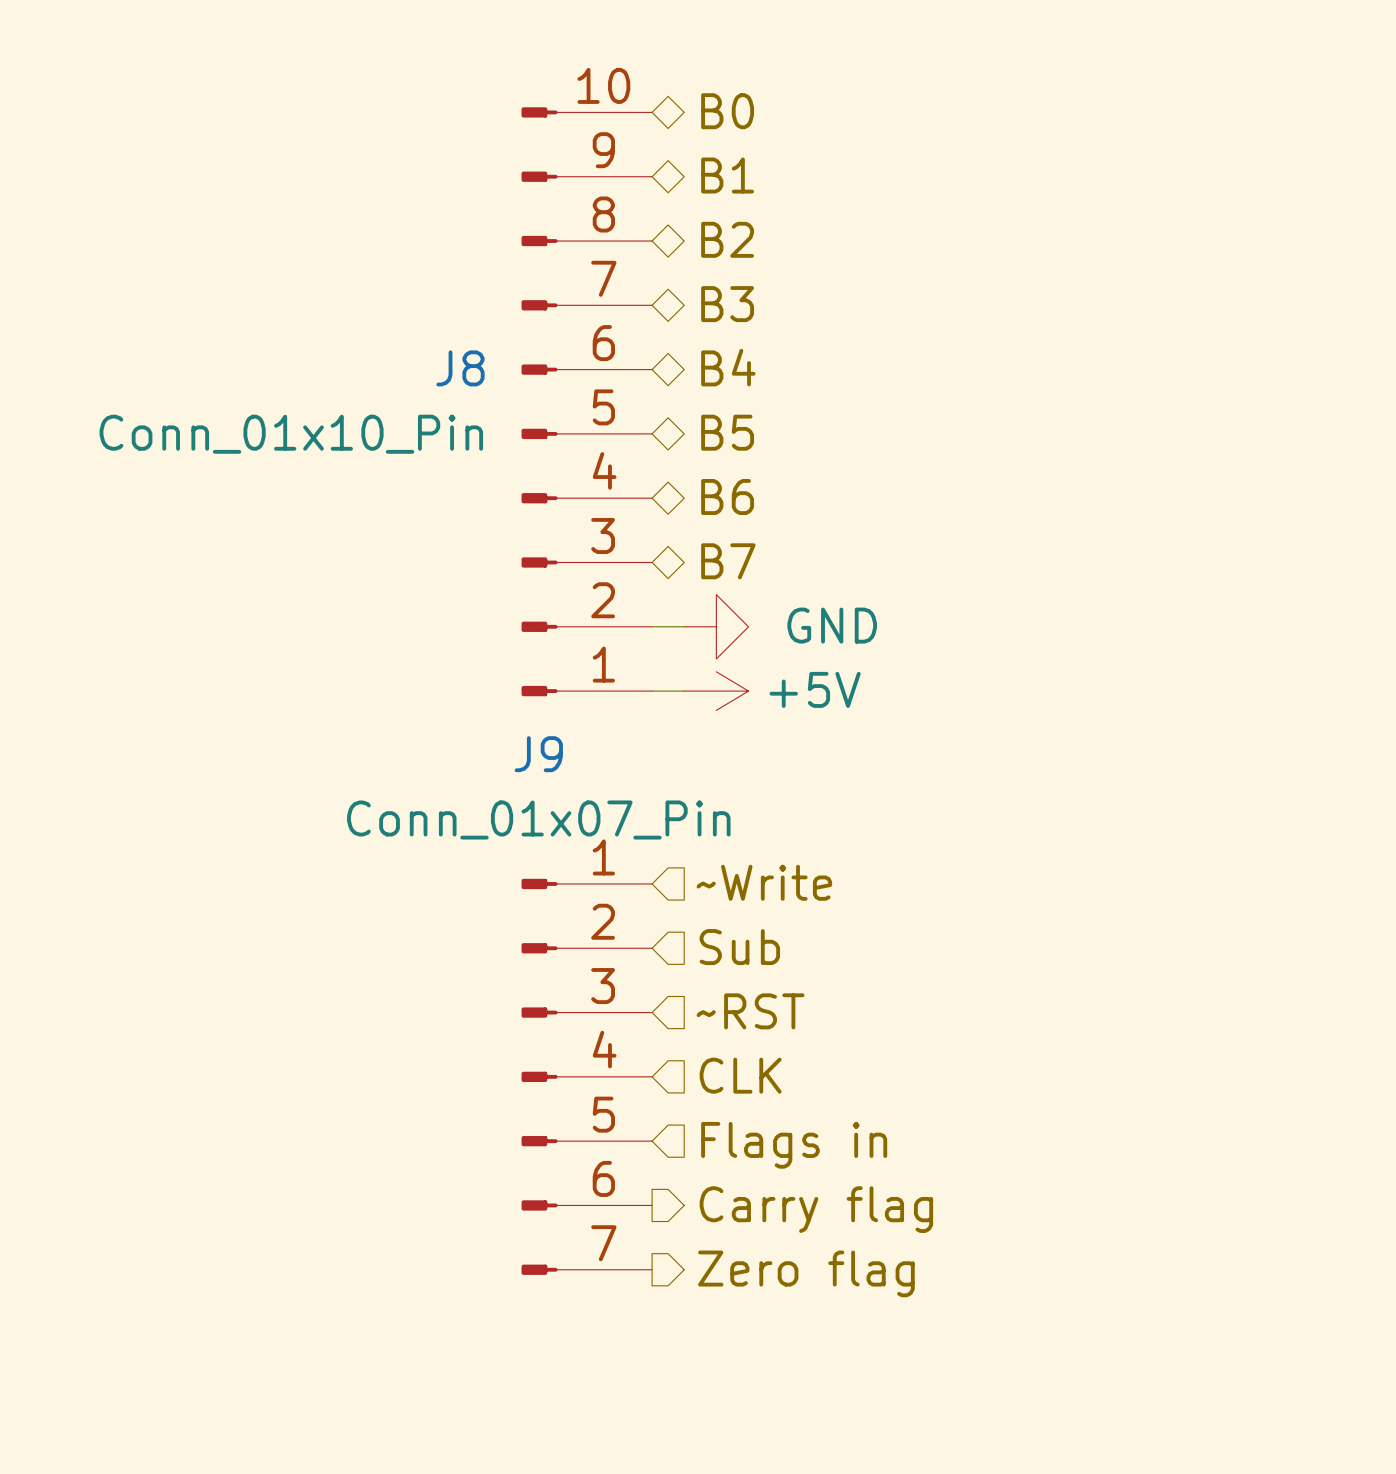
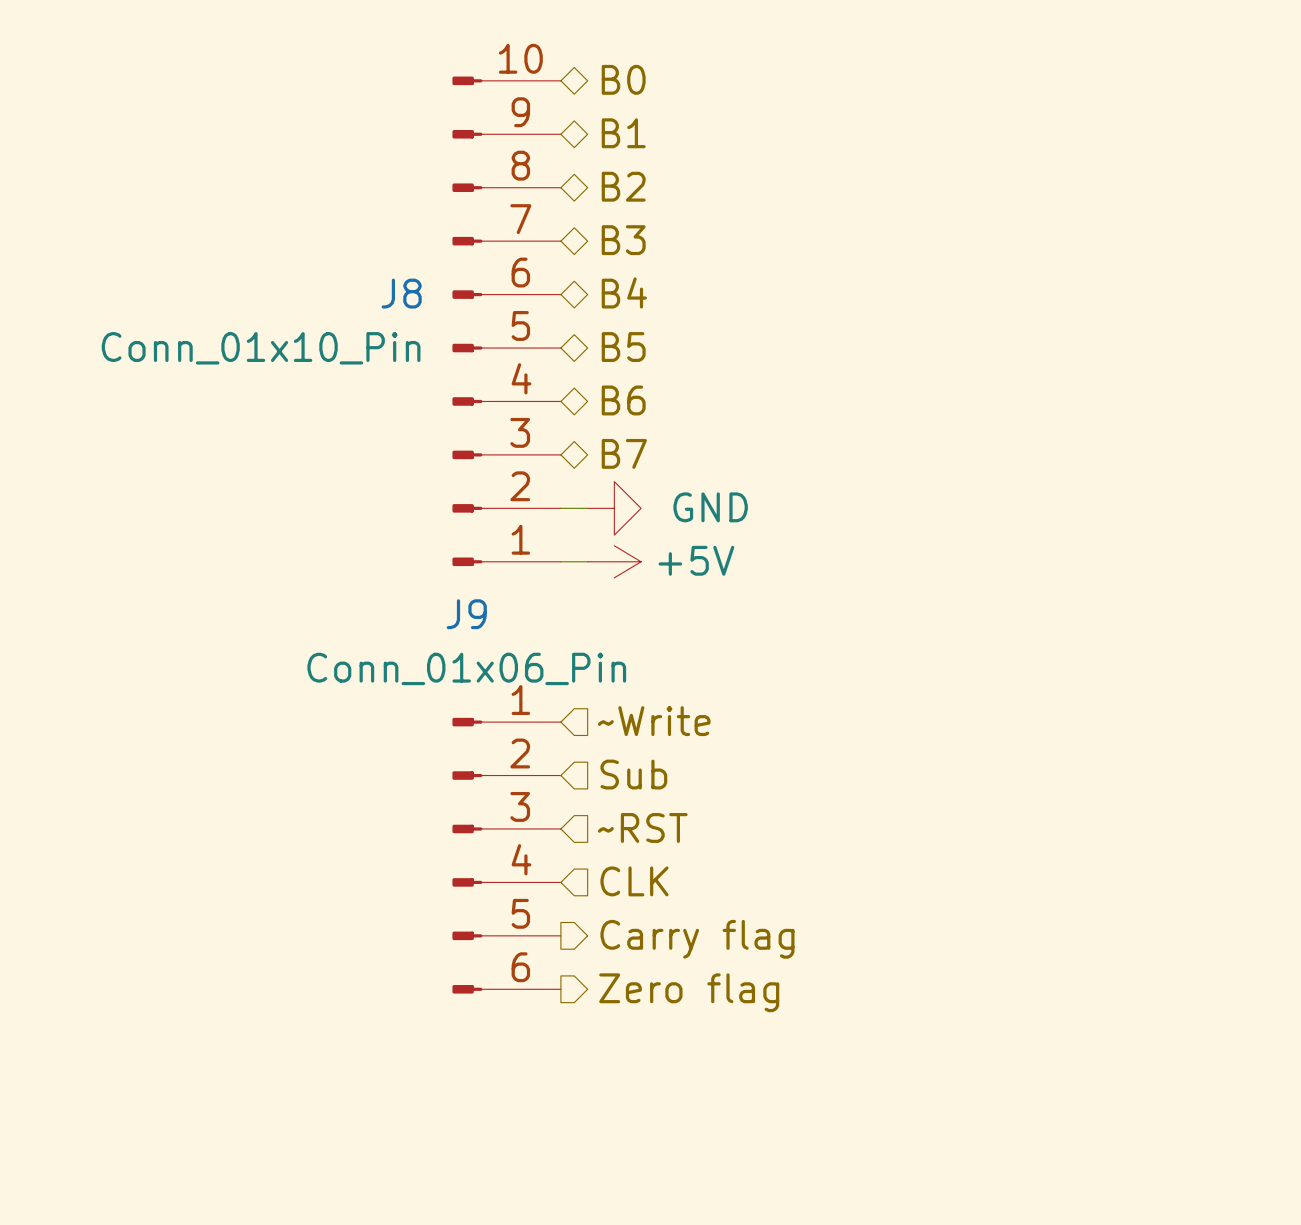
J9 value: Conn_01x07_Pin (538, 820) -> Conn_01x06_Pin (466, 668)
J9 symbol: [521, 878, 653, 1275] -> [452, 717, 561, 994]
hierarchical label shape: input (794, 1145) -> output (697, 939)
hierarchical label: Flags in (794, 1145) -> Carry flag (697, 939)
hierarchical label: Carry flag (816, 1209) -> Zero flag (689, 992)
hierarchical label: Zero flag (806, 1273) -> none

